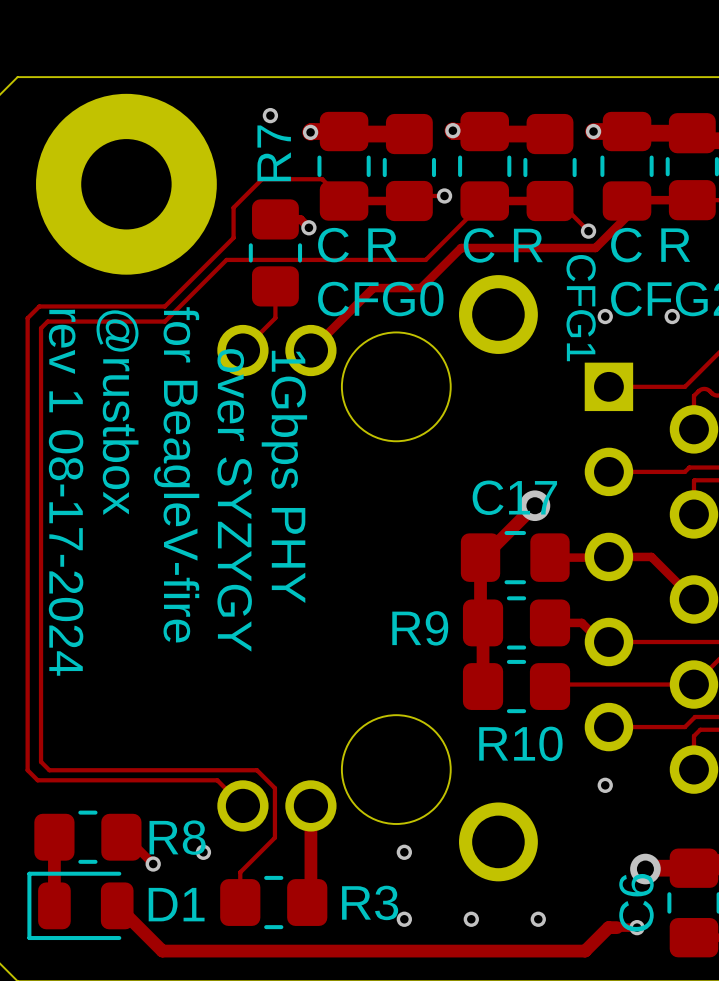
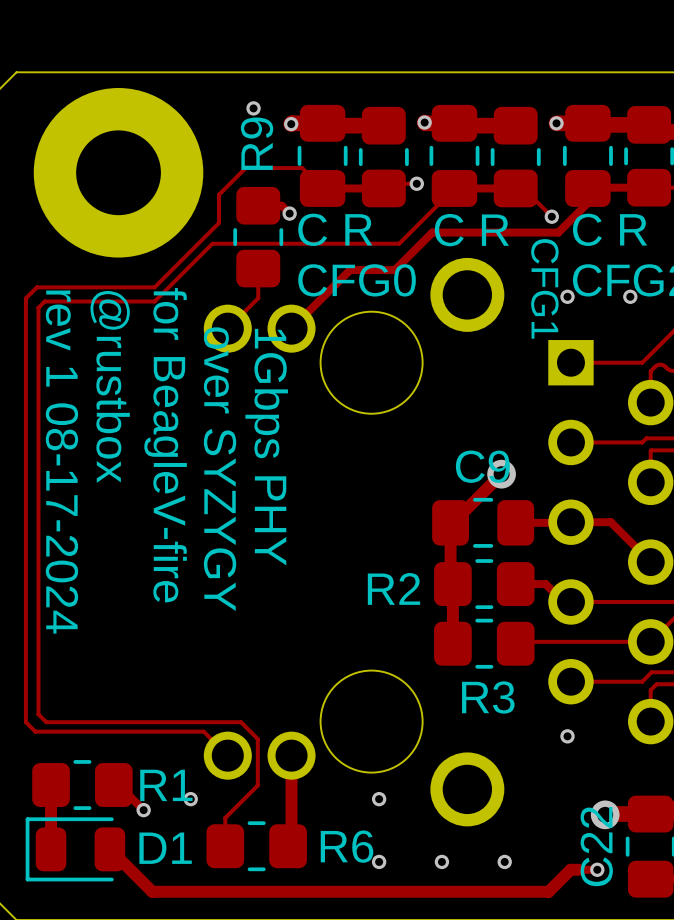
R7 name: R7 (274, 153) -> R9 (257, 143)
C17 name: C17 (514, 497) -> C9 (482, 466)
R9 name: R9 (420, 628) -> R2 (393, 588)
R10 name: R10 (520, 743) -> R3 (488, 697)
R8 name: R8 (177, 837) -> R1 (166, 785)
R3 name: R3 (370, 902) -> R6 (347, 846)
C6 name: C6 (636, 902) -> C22 (596, 846)

